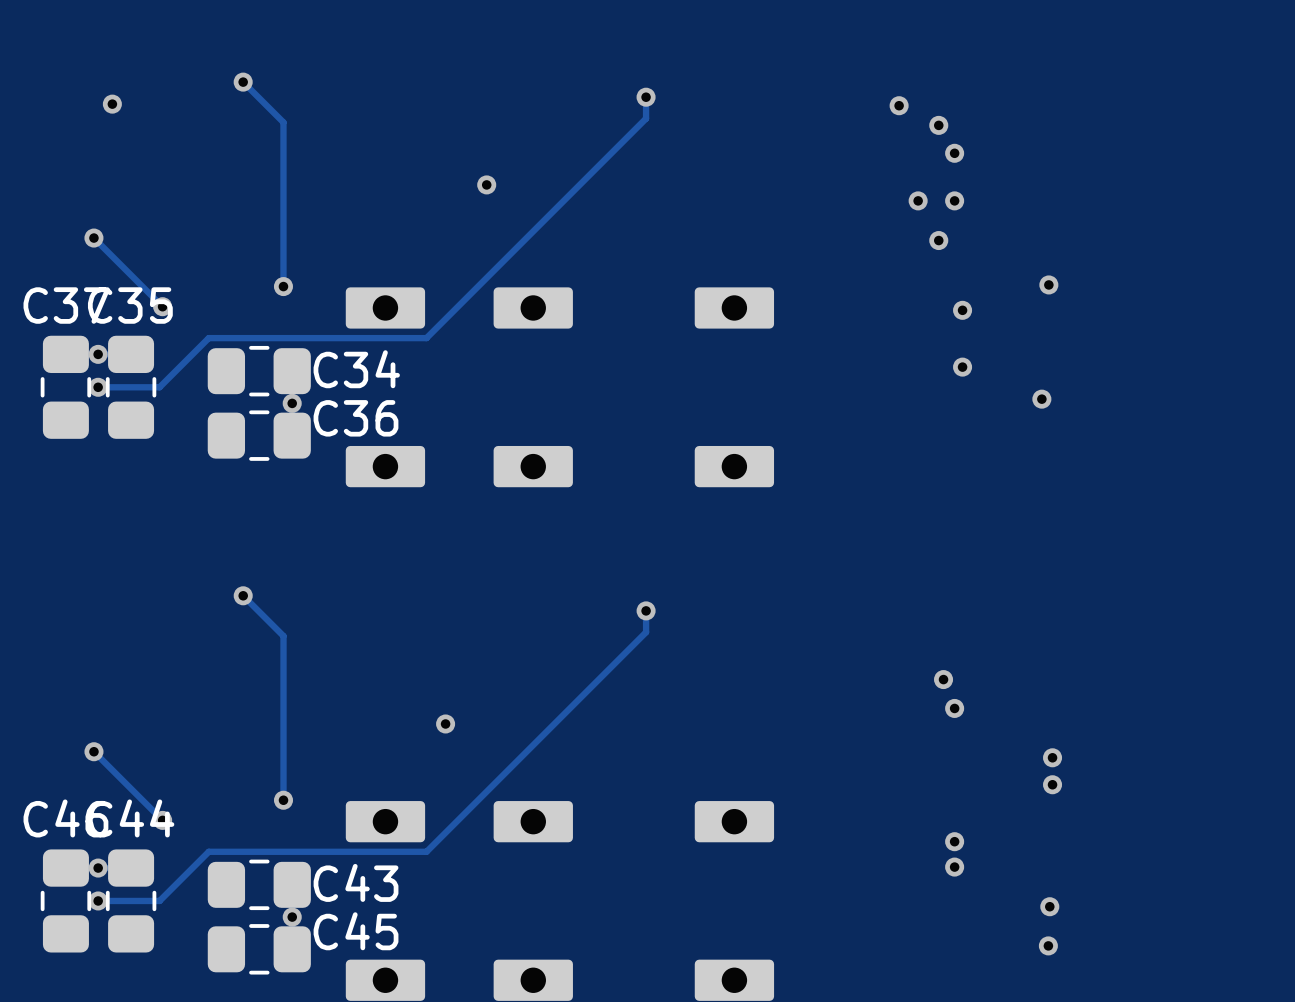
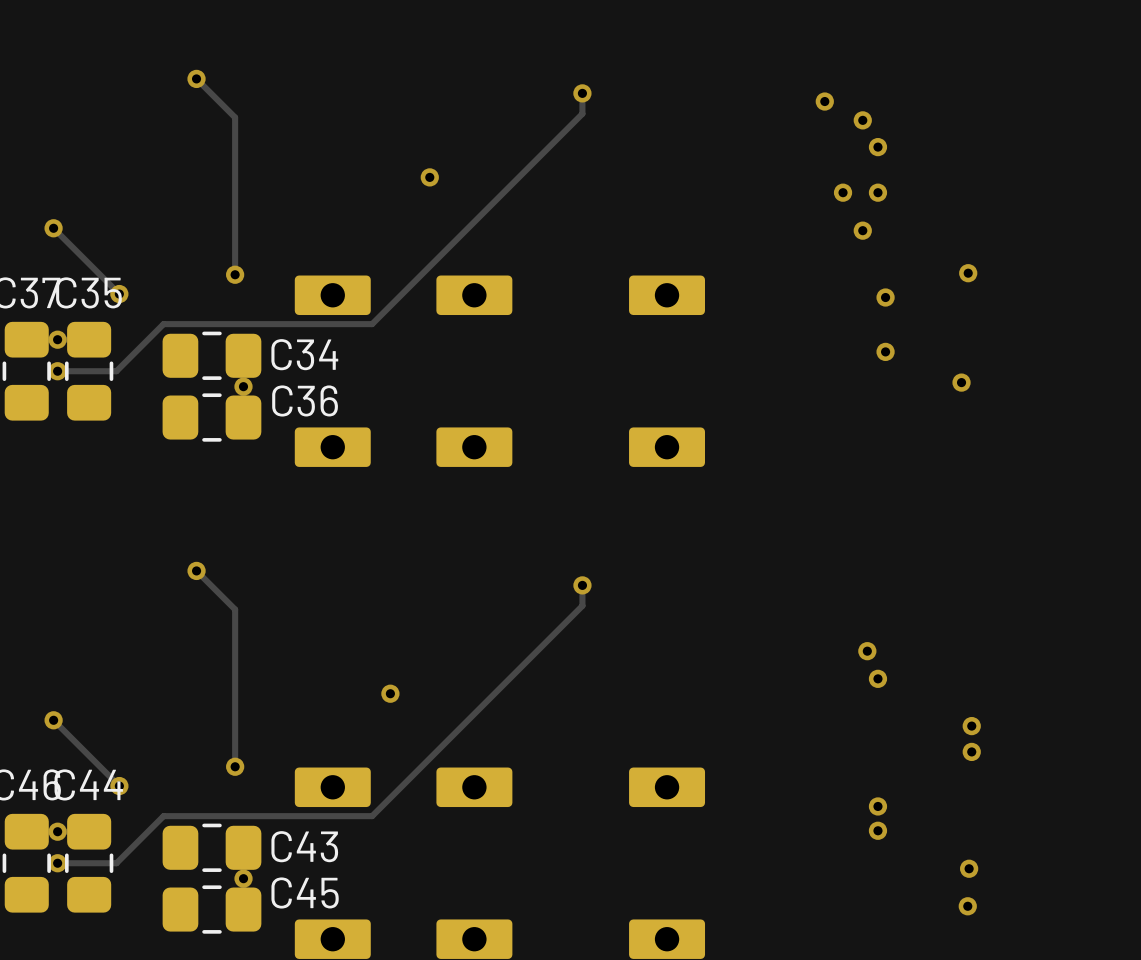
via: (112, 104) -> none

